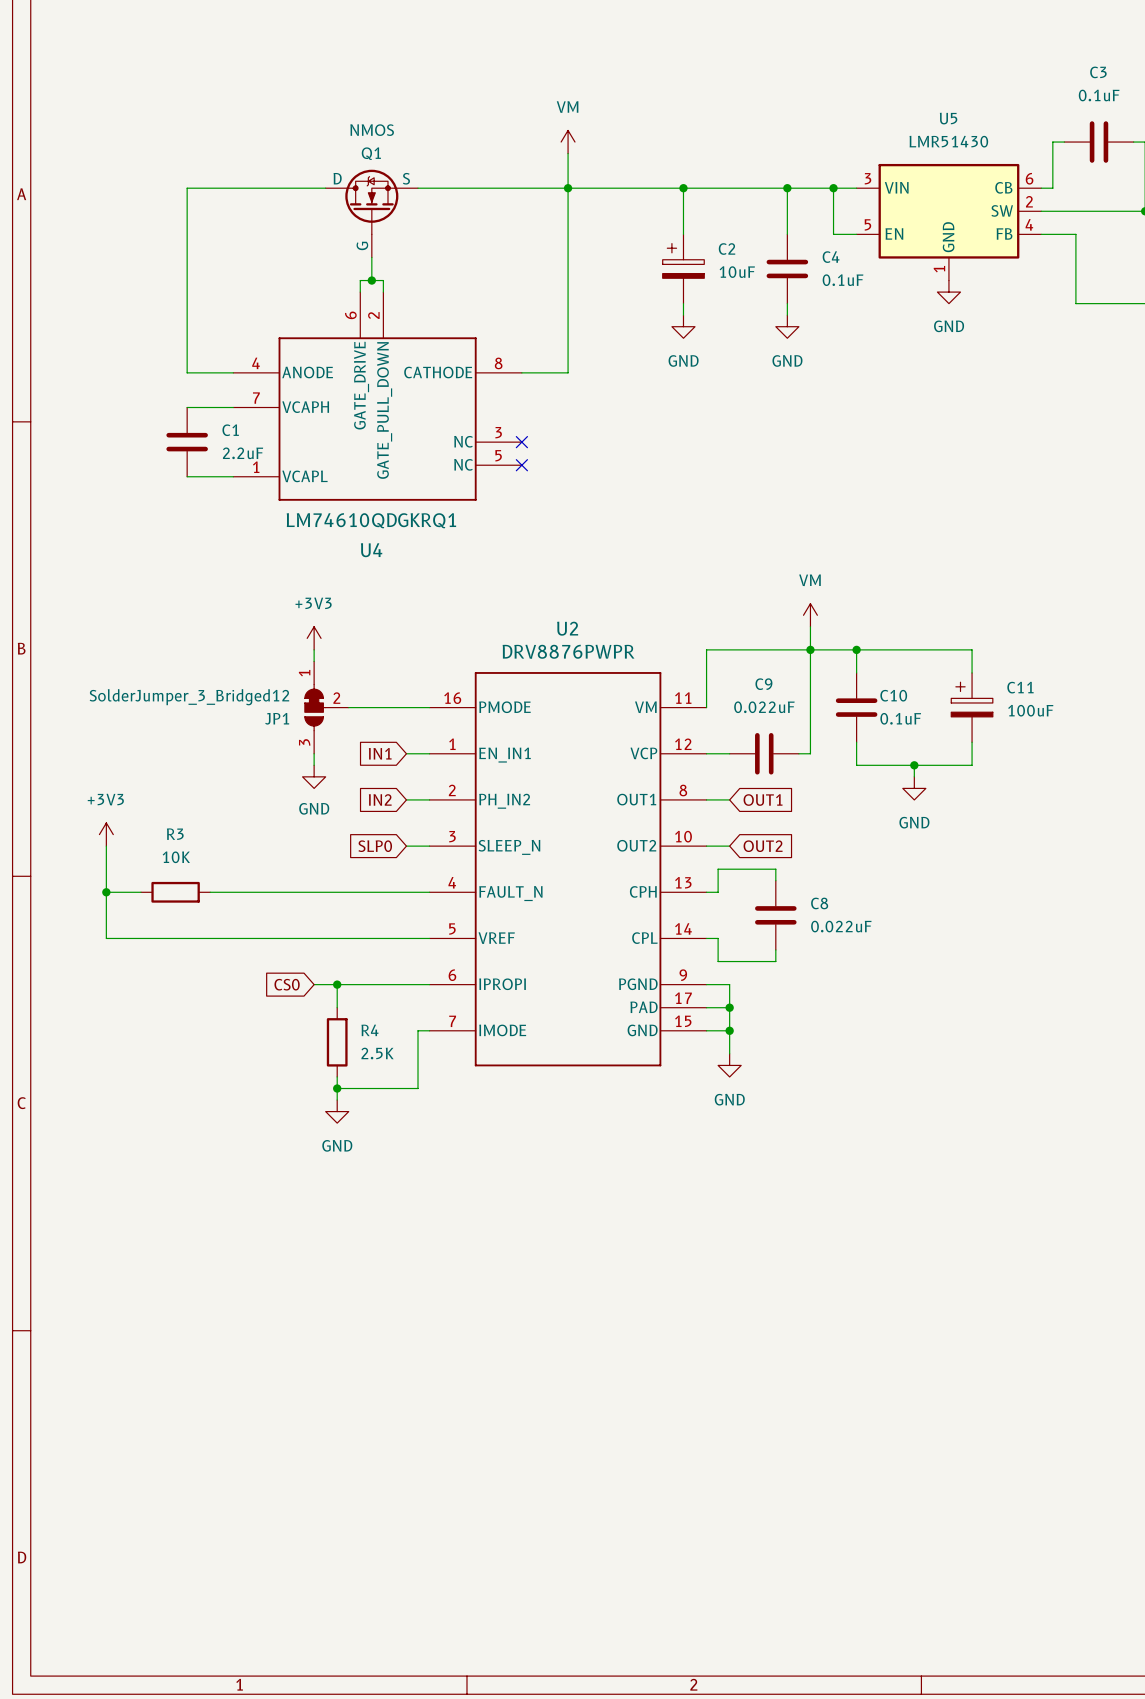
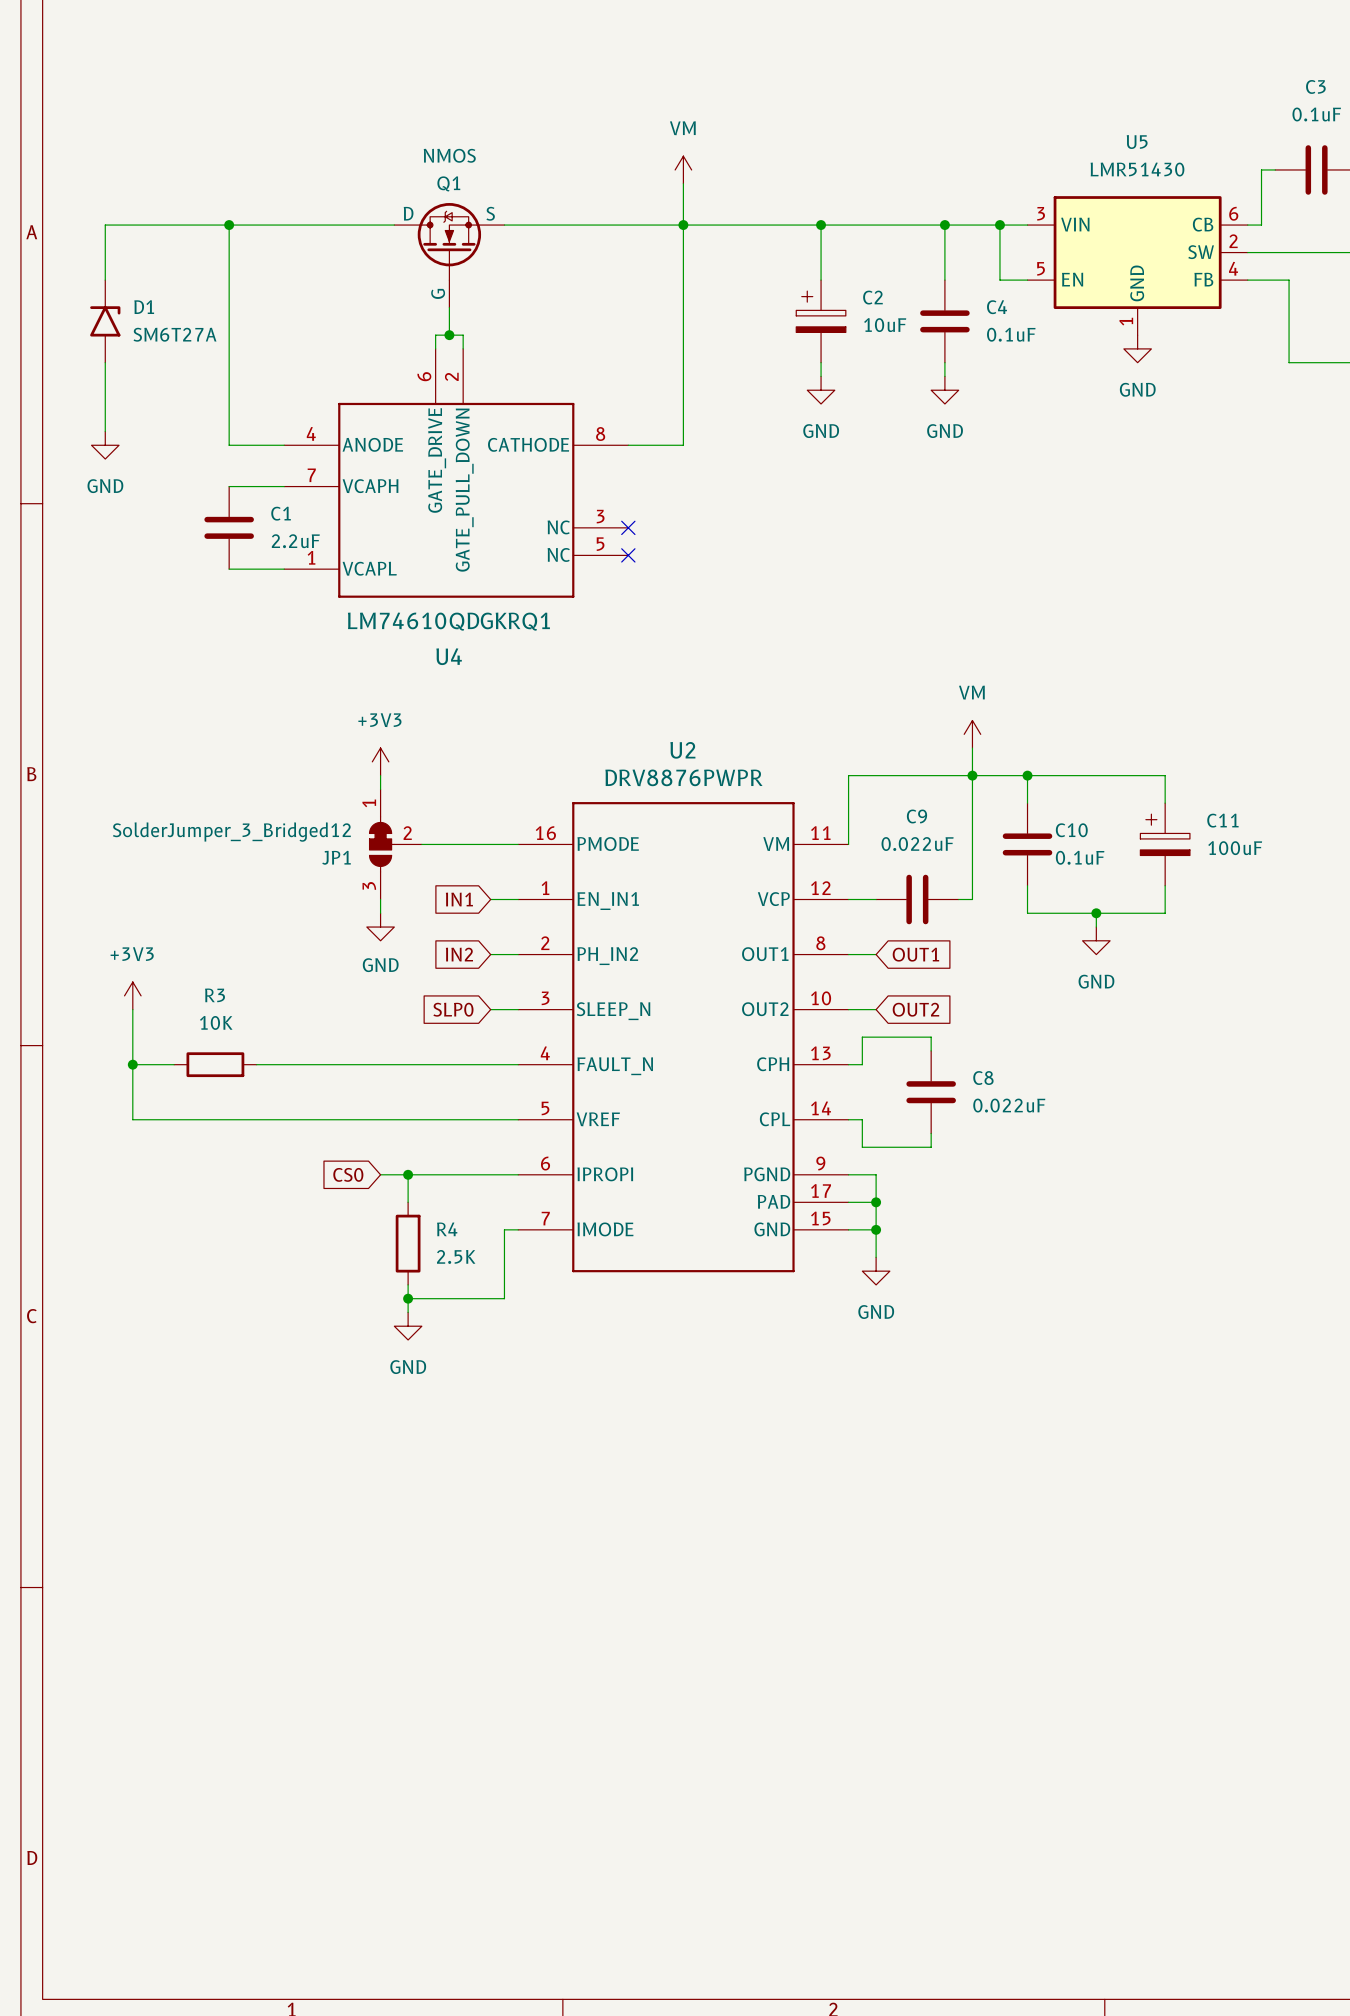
wire: none -> (229, 225) (105, 225) (105, 280)
junction: none -> (229, 225)
D1: none -> SM6T27A (105, 321)
wire: none -> (105, 362) (105, 431)
power symbol: none -> GND (105, 445)

